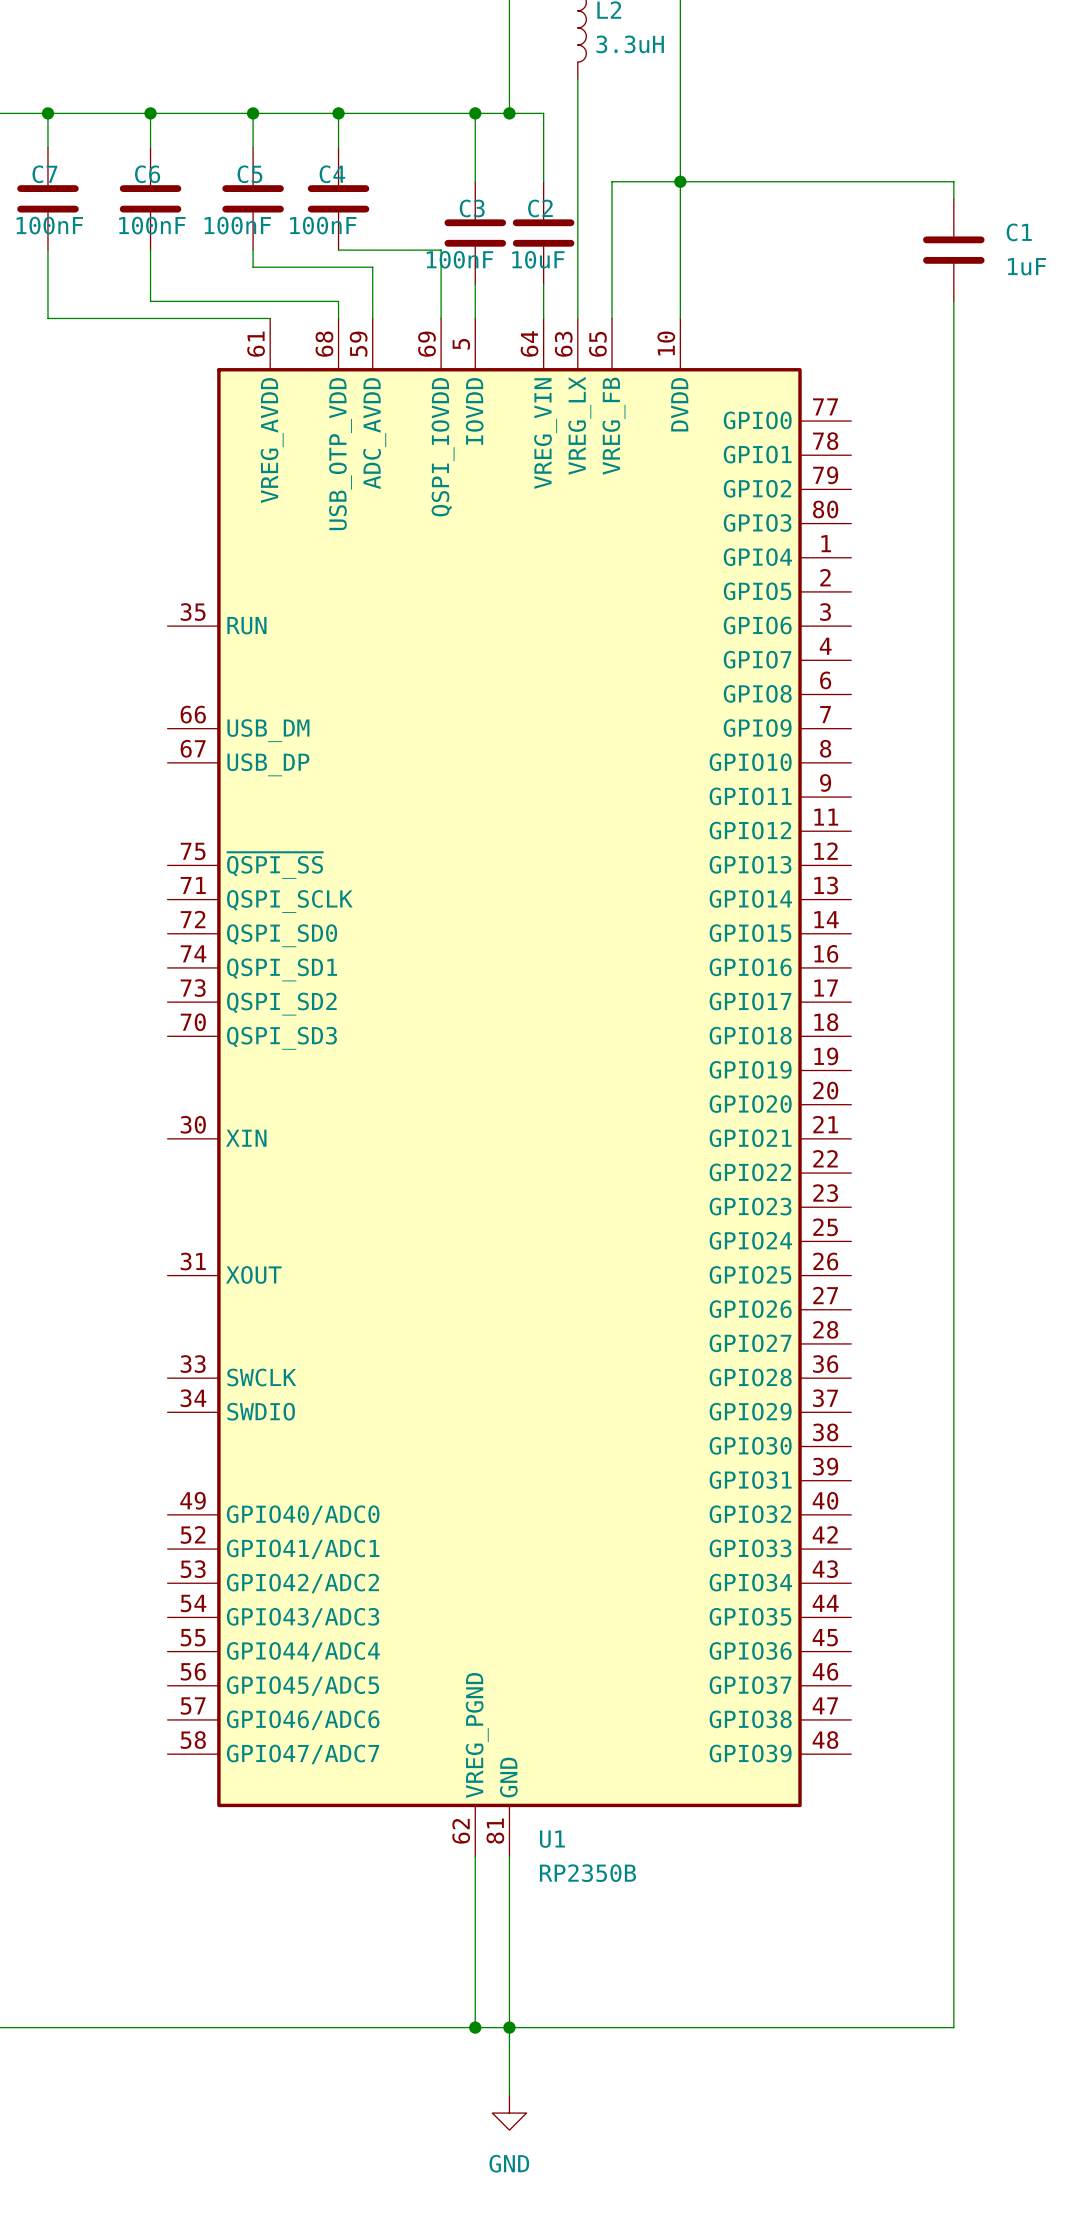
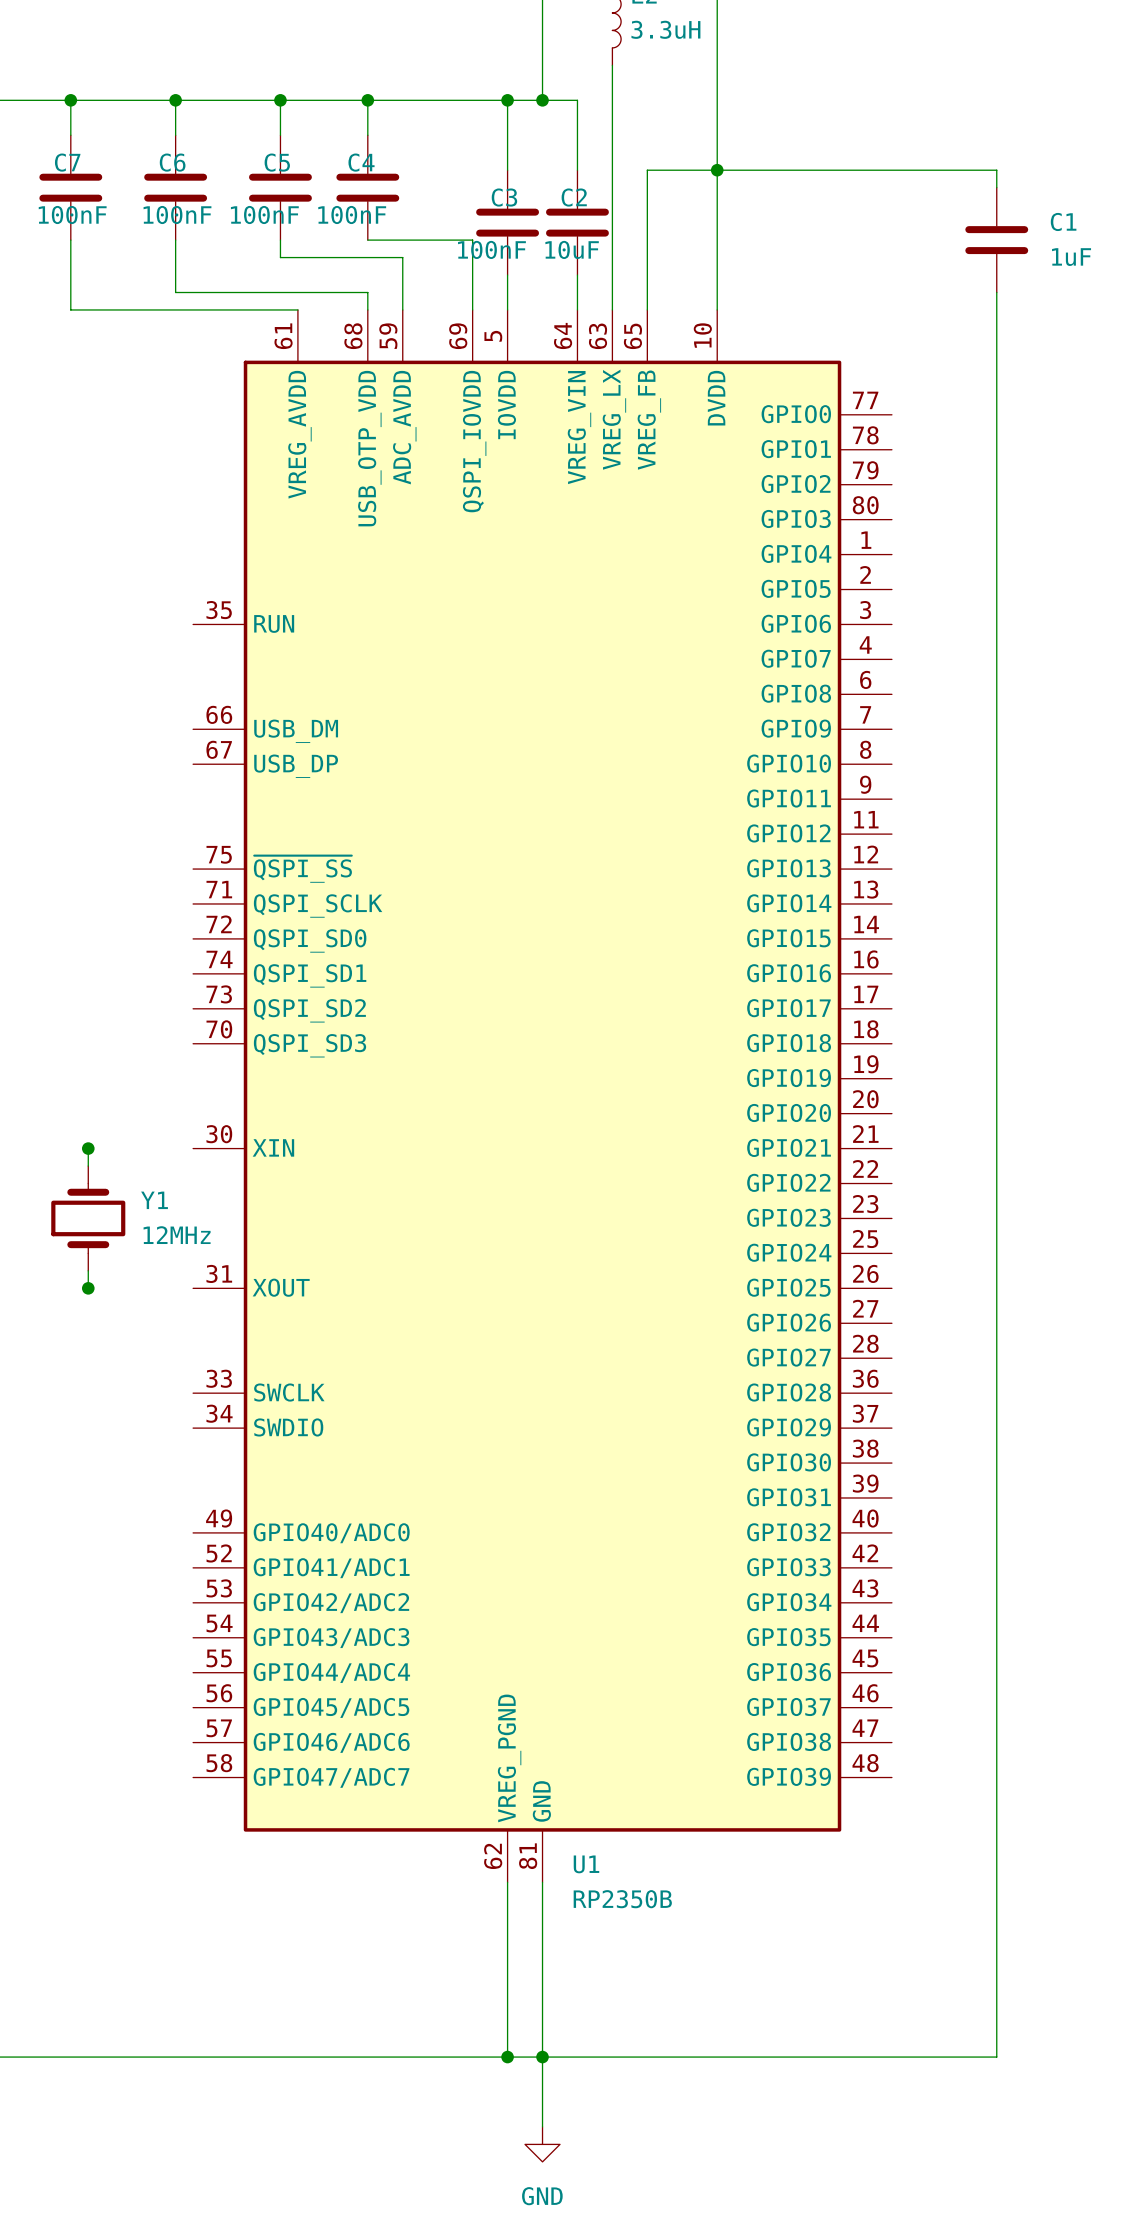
wire: none -> (88, 1148) (88, 1166)
junction: none -> (88, 1148)
Y1: none -> 12MHz (88, 1218)
wire: none -> (88, 1270) (88, 1288)
junction: none -> (88, 1288)

